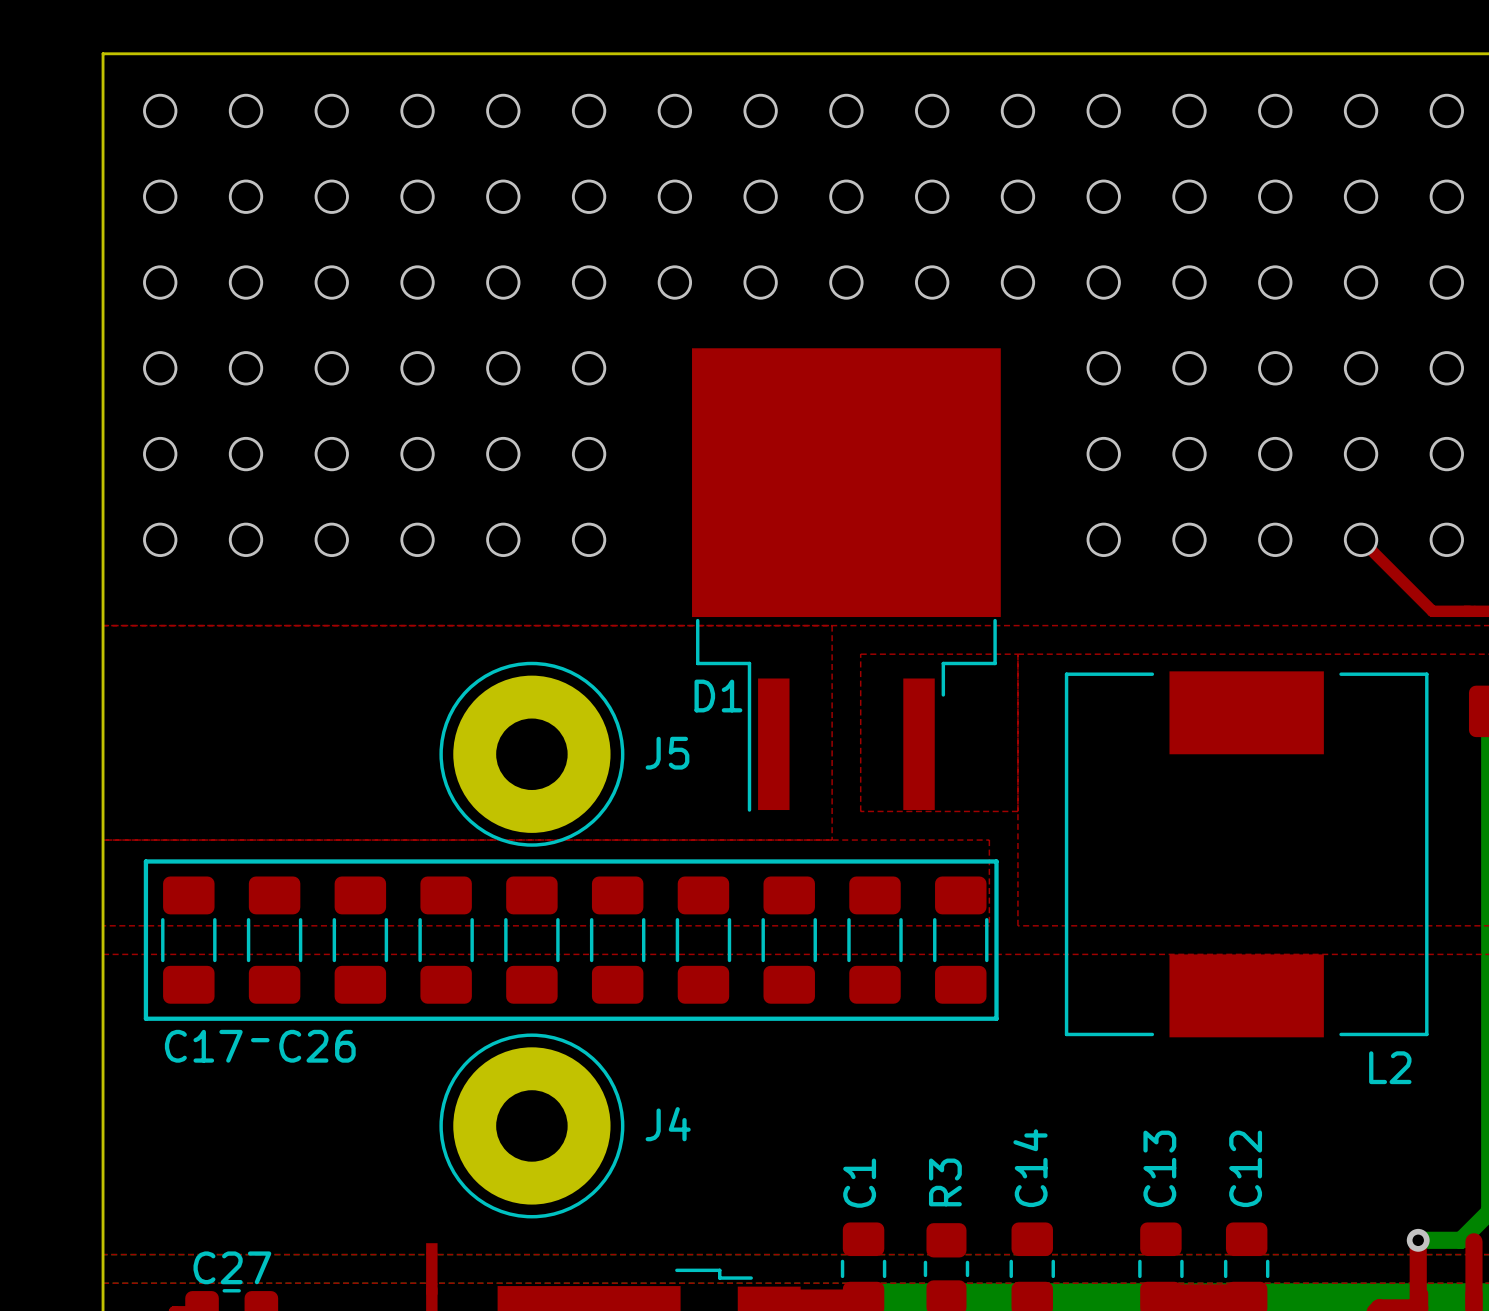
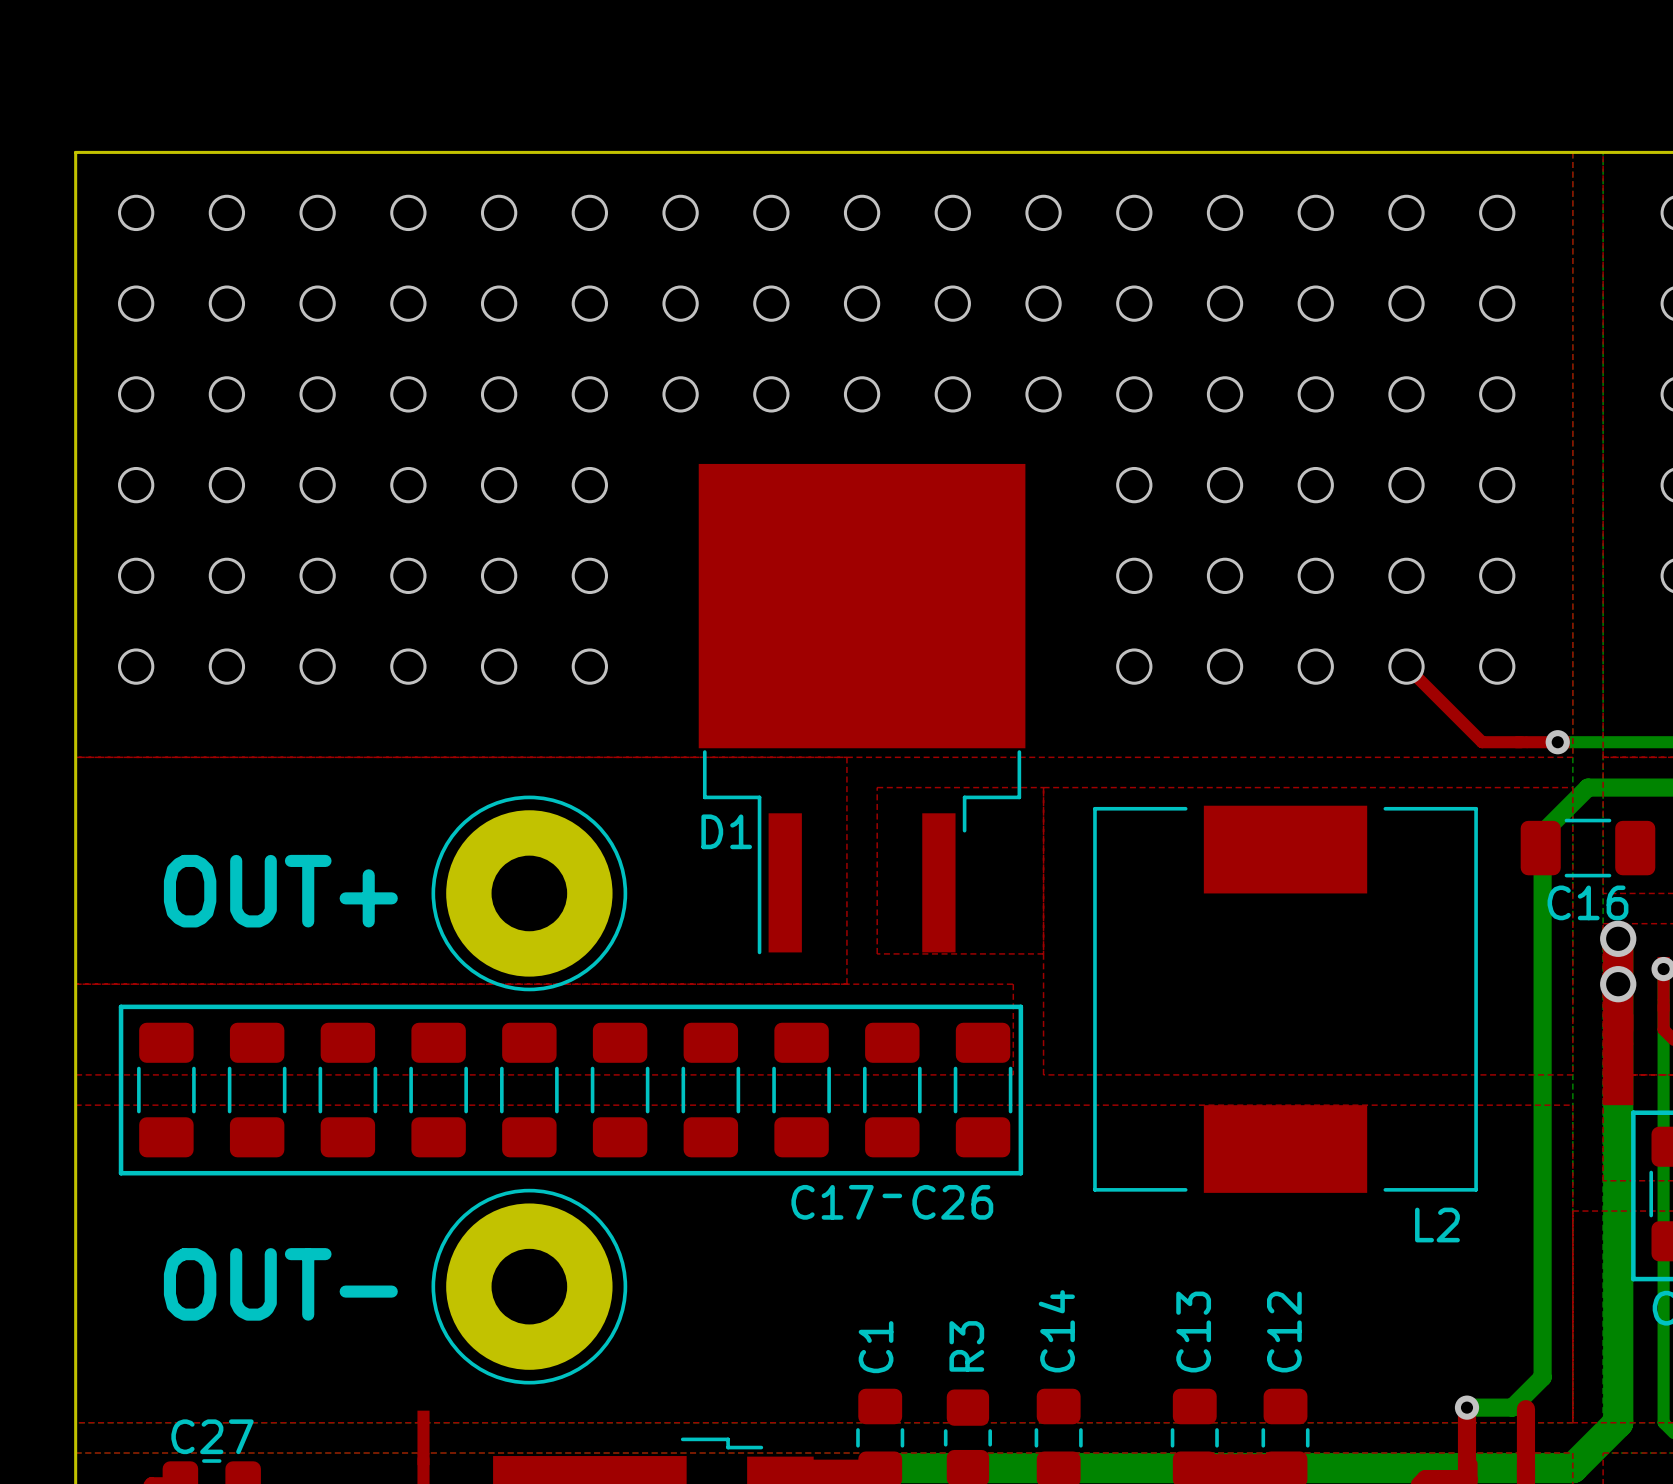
J5 value: none -> OUT+ (280, 891)
J5 name: J5 (667, 753) -> none
line: (253, 1040) (267, 1040) -> (884, 1195) (899, 1195)
C17 name position: C17 (203, 1046) -> C17 (832, 1202)
C26 name position: C26 (317, 1046) -> C26 (952, 1202)
J4 value: none -> OUT- (280, 1284)
J4 name: J4 (668, 1124) -> none

